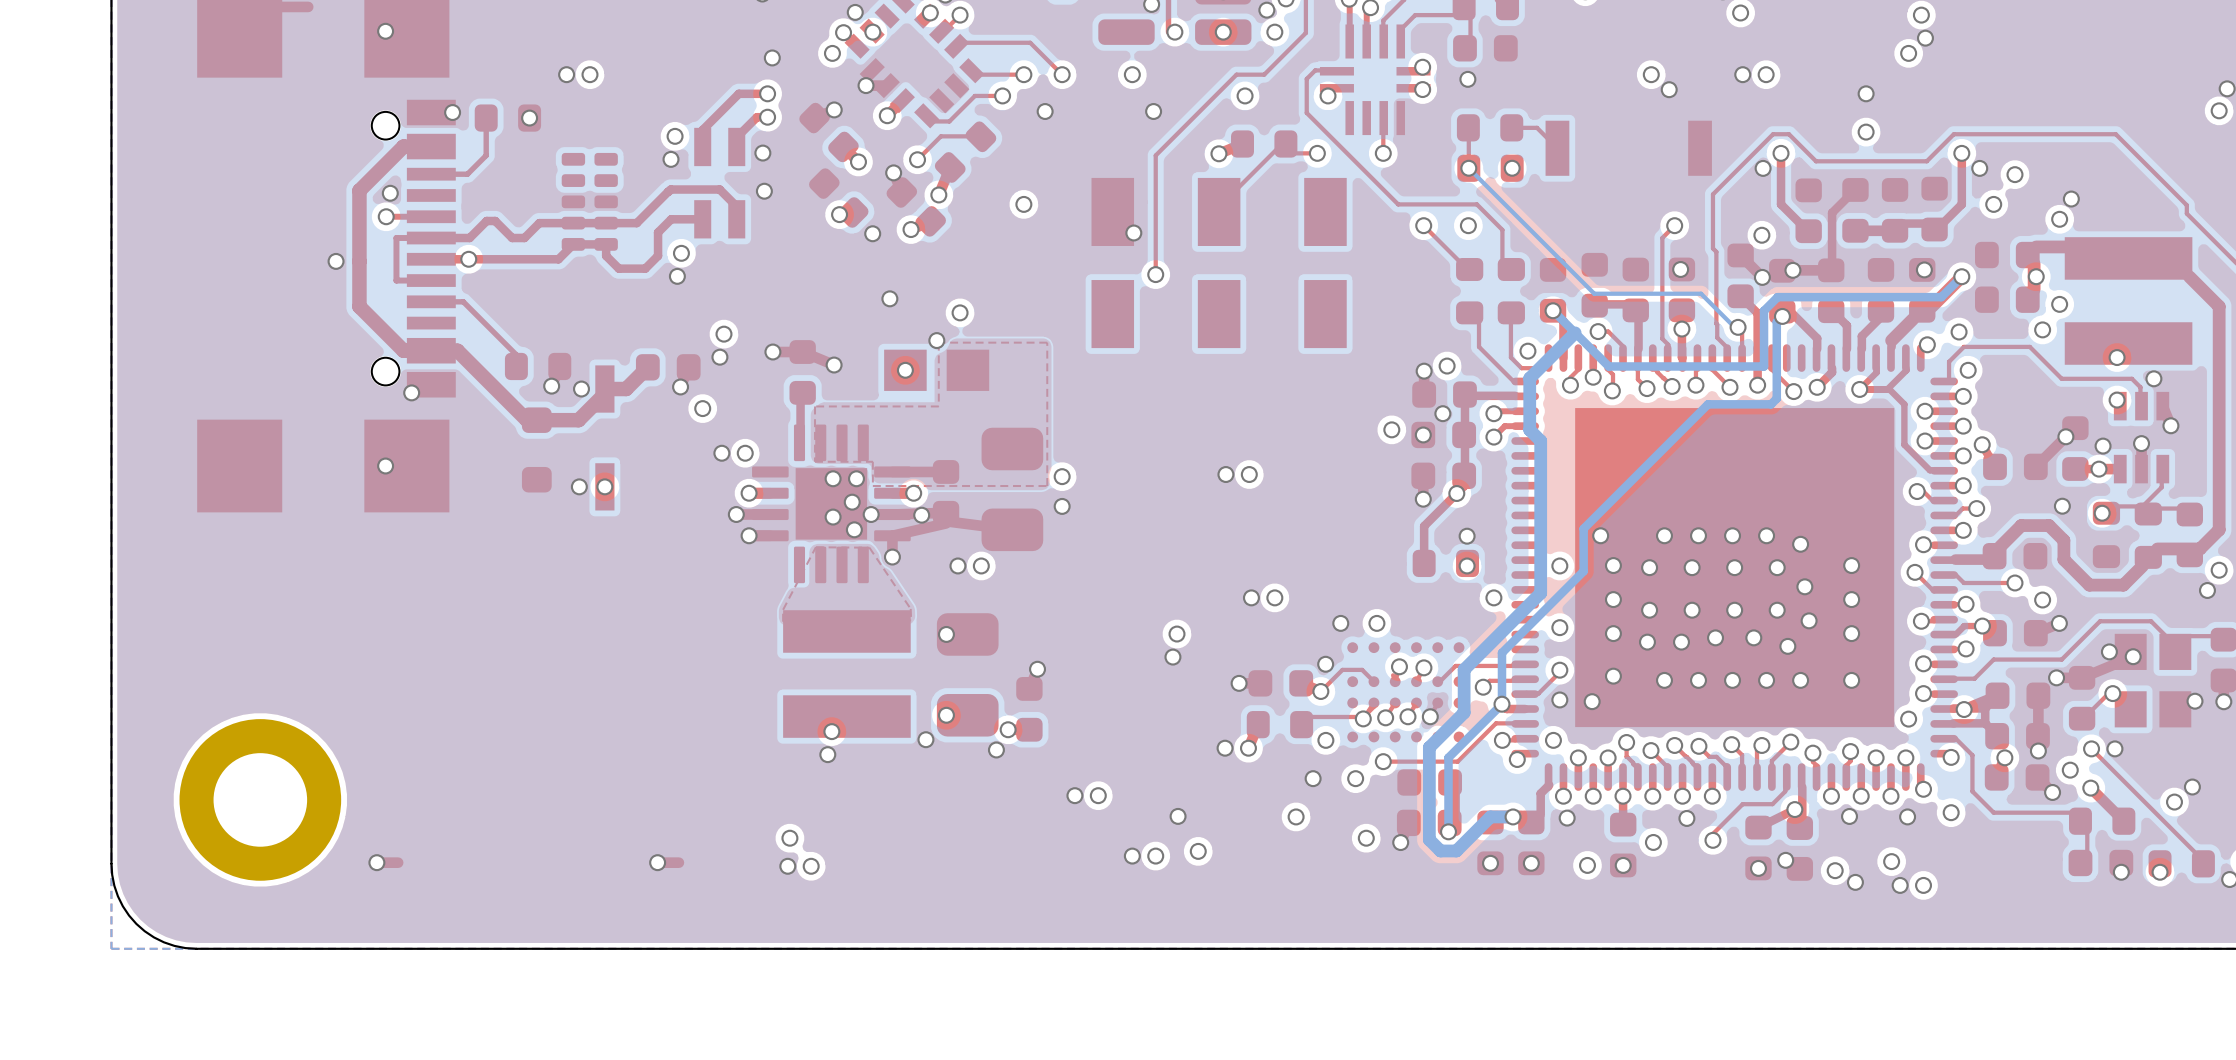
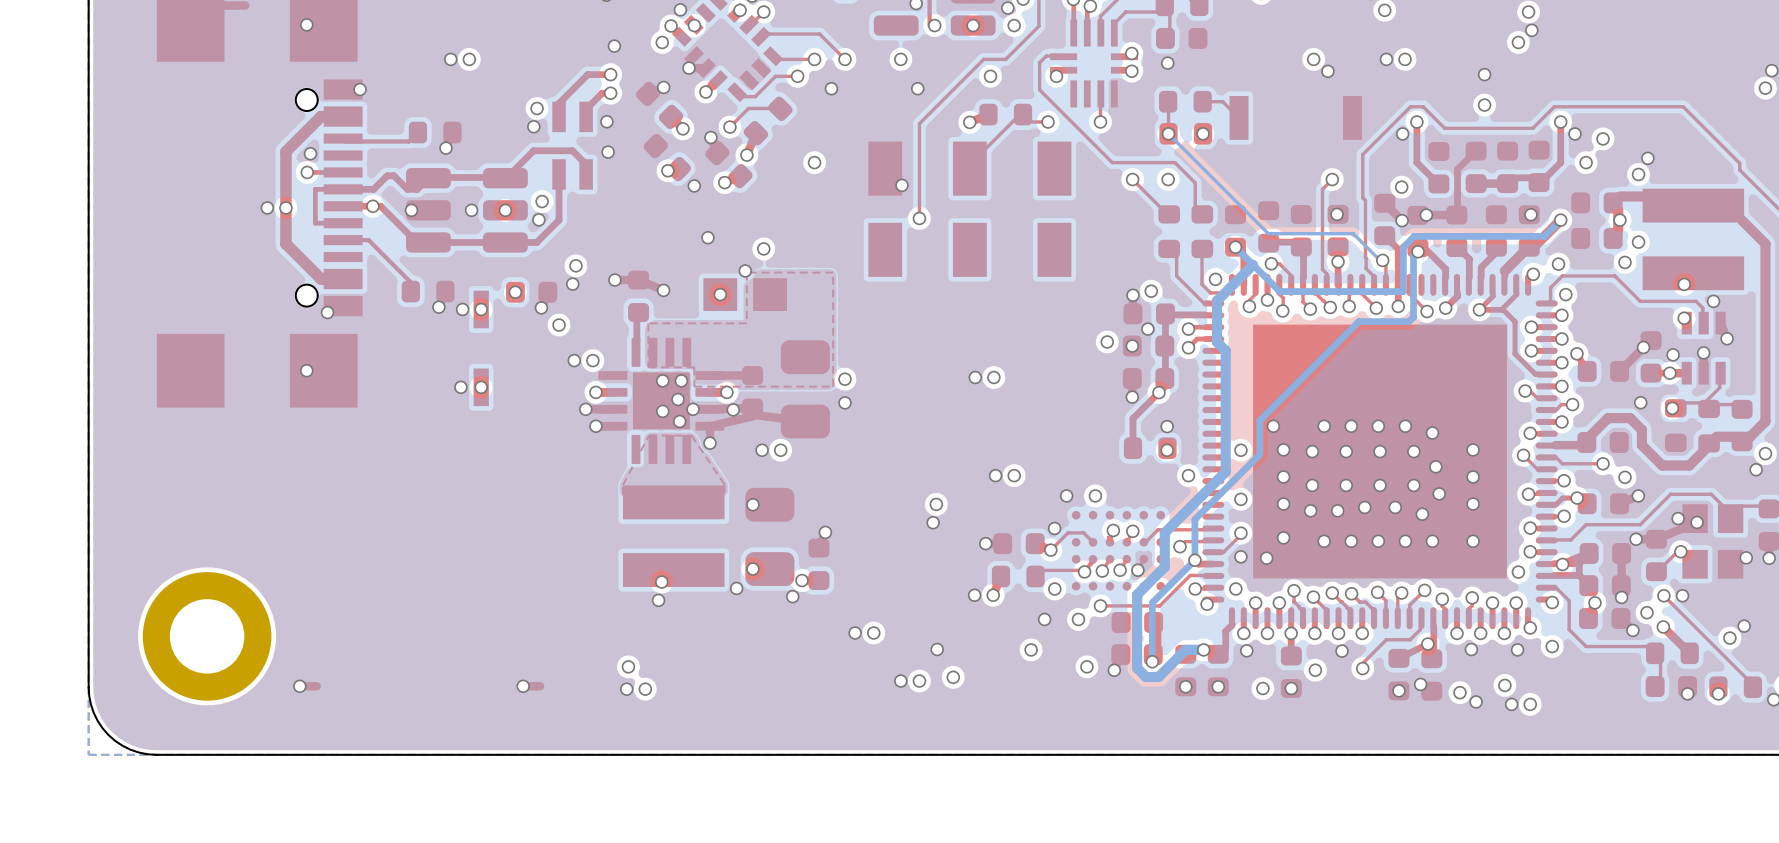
top track: (486, 118) (486, 155) (467, 174) (431, 174) -> (417, 132) (408, 141) (346, 141) (343, 138)
part position: (507, 118) -> (435, 132)
via: (529, 118) -> none
via: none -> (445, 148)
part: (589, 201) -> none
top track: (702, 219) (671, 219) (658, 232) (658, 255) (645, 268) (618, 268) (606, 255) (606, 244) (573, 244) (558, 259) (478, 259) -> (559, 174) (559, 220) (536, 242) (416, 242) (380, 206)
via: none -> (285, 207)
via: none -> (411, 210)
part: none -> (466, 210)
via: none -> (471, 210)
via: none -> (505, 210)
top track: (431, 350) (457, 350) (526, 420) (578, 420) (604, 393) (604, 389) (626, 389) (647, 367) -> none
via: none -> (515, 292)
via: none -> (481, 309)
part: (536, 449) -> none

